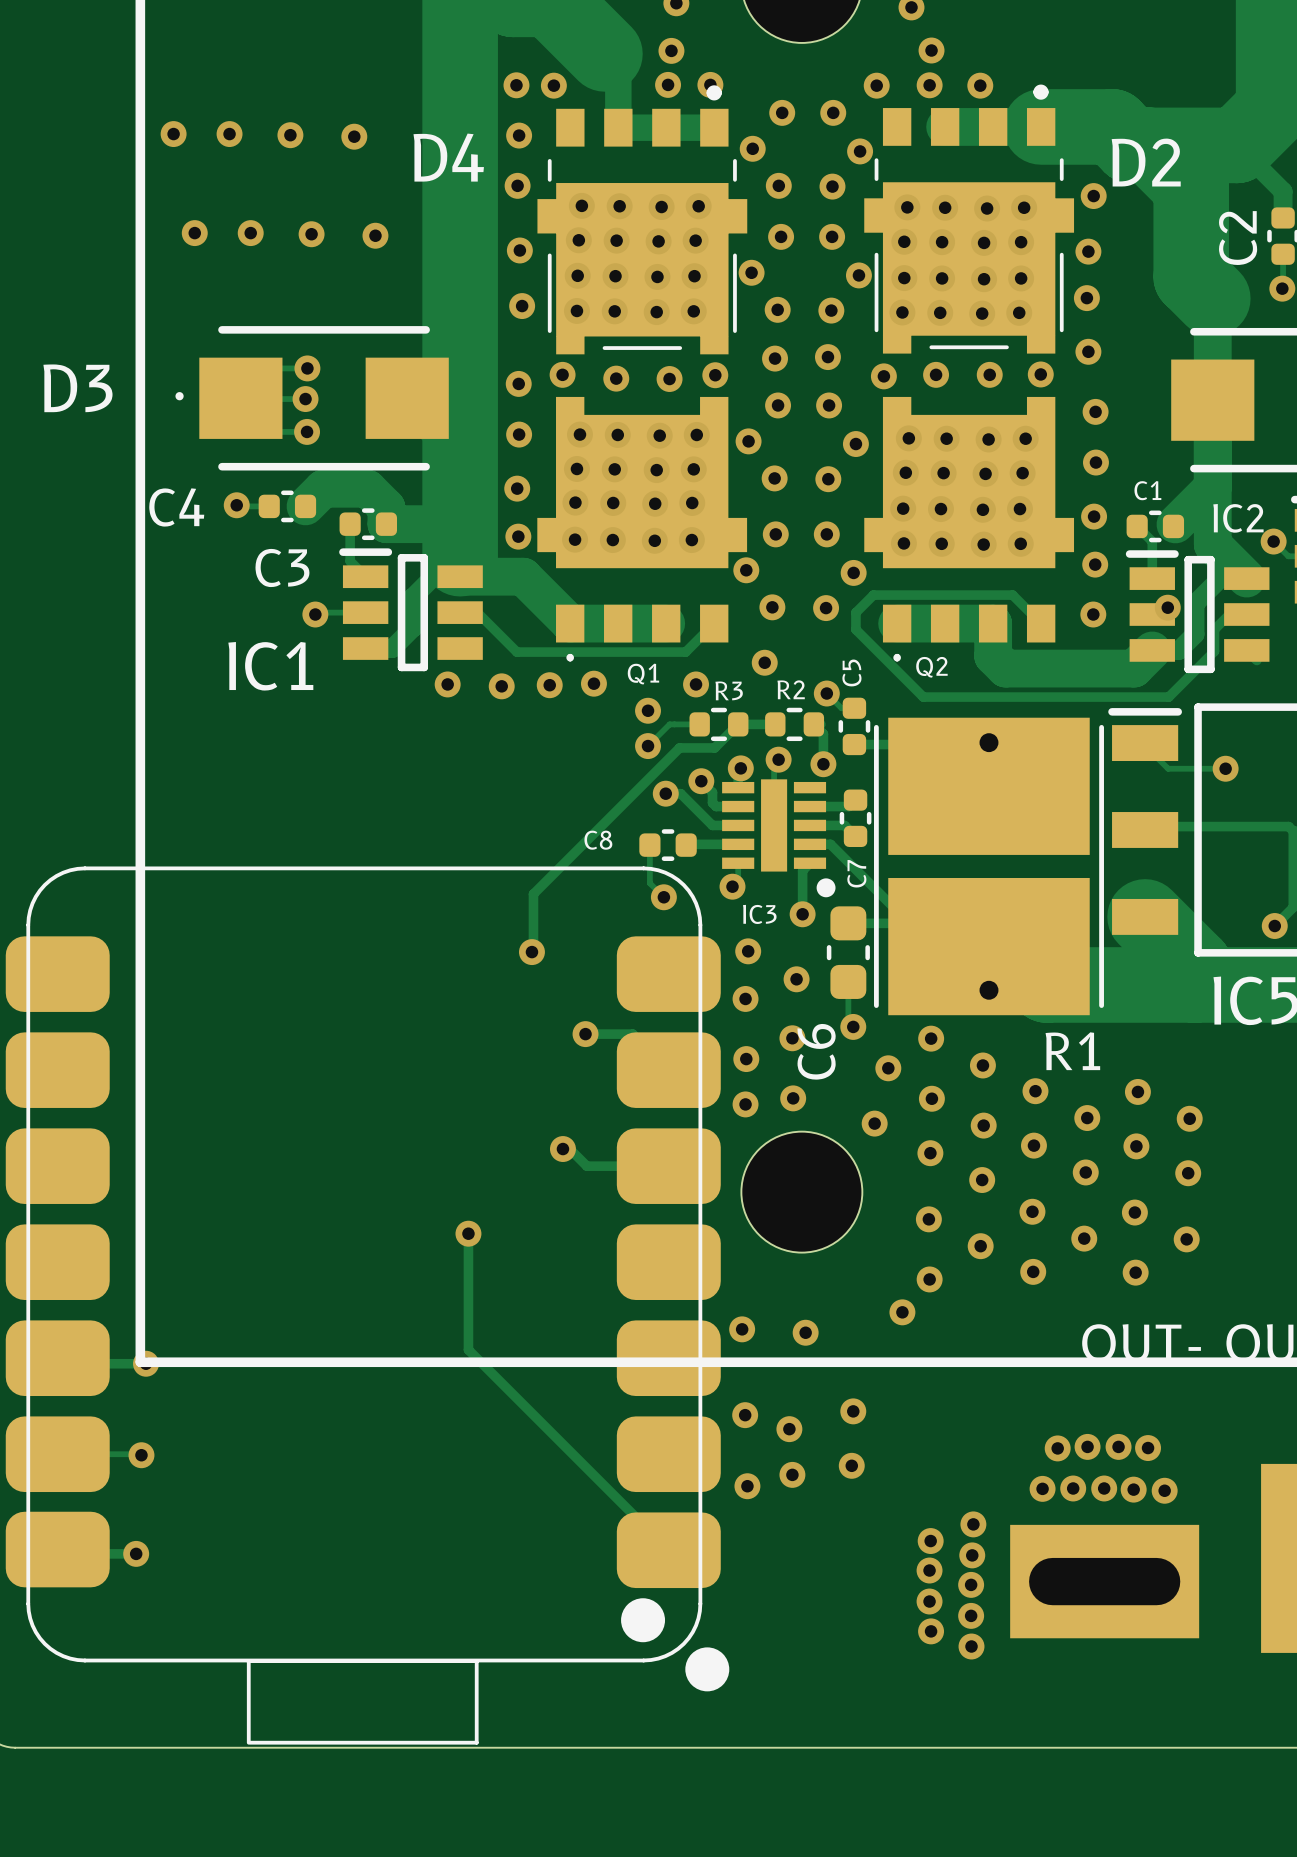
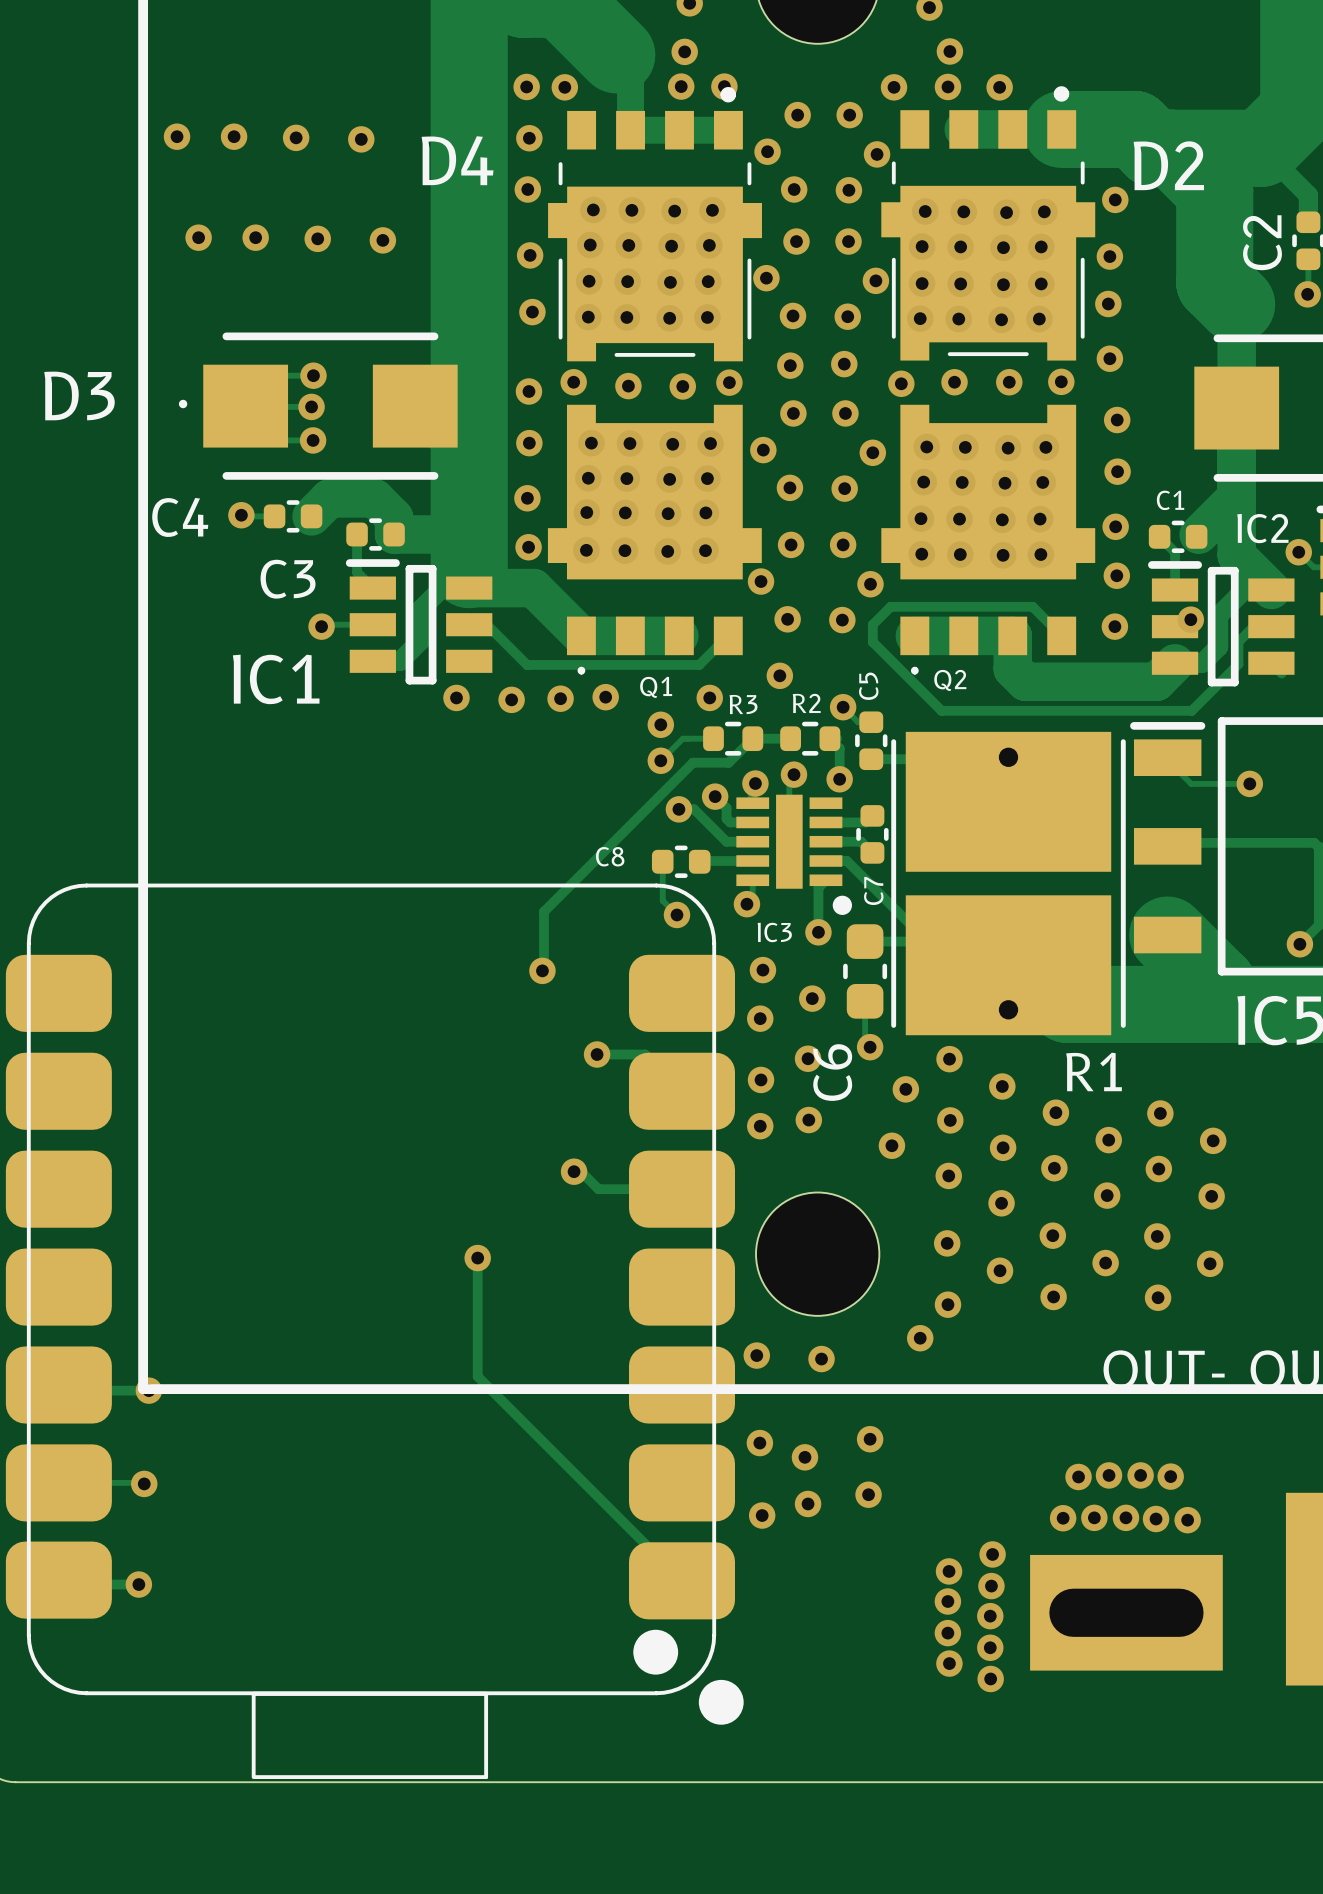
part position: (801, 1192) -> (817, 1254)

